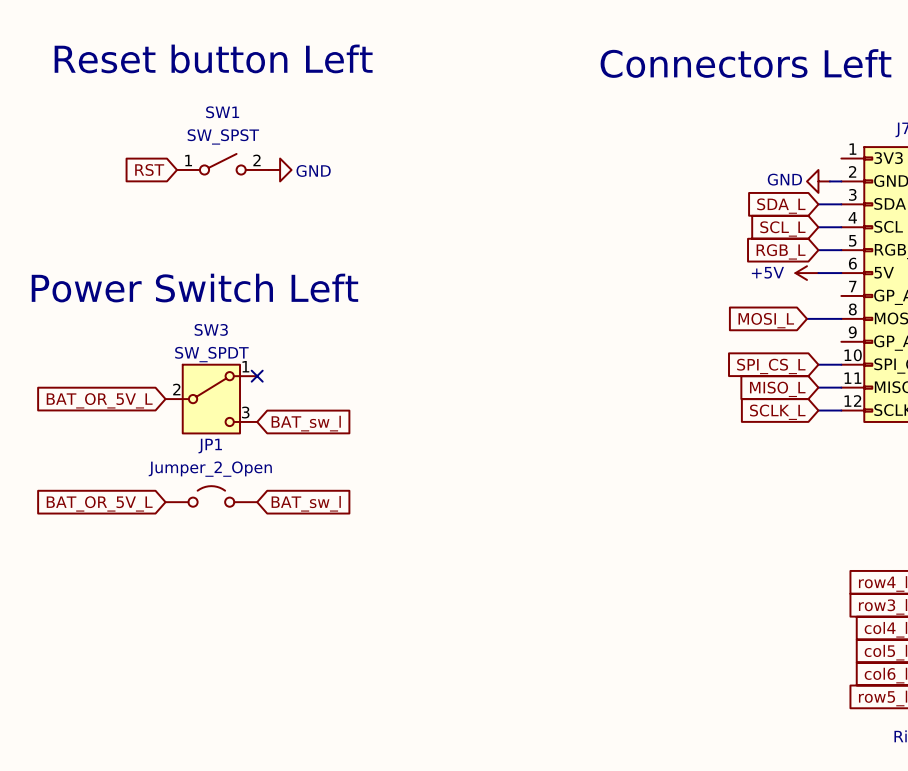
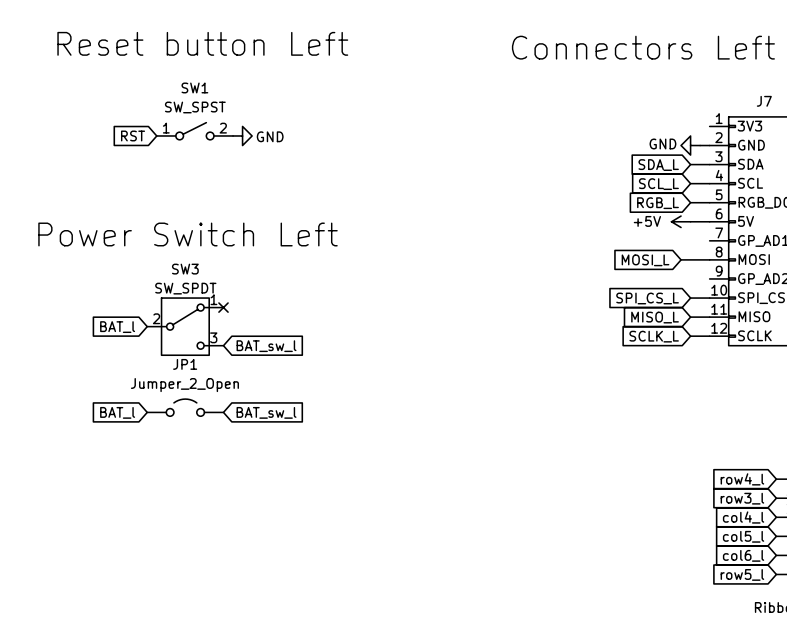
global label: BAT_OR_5V_L (99, 400) -> BAT_l (117, 327)
global label: BAT_OR_5V_L (99, 503) -> BAT_l (117, 412)

